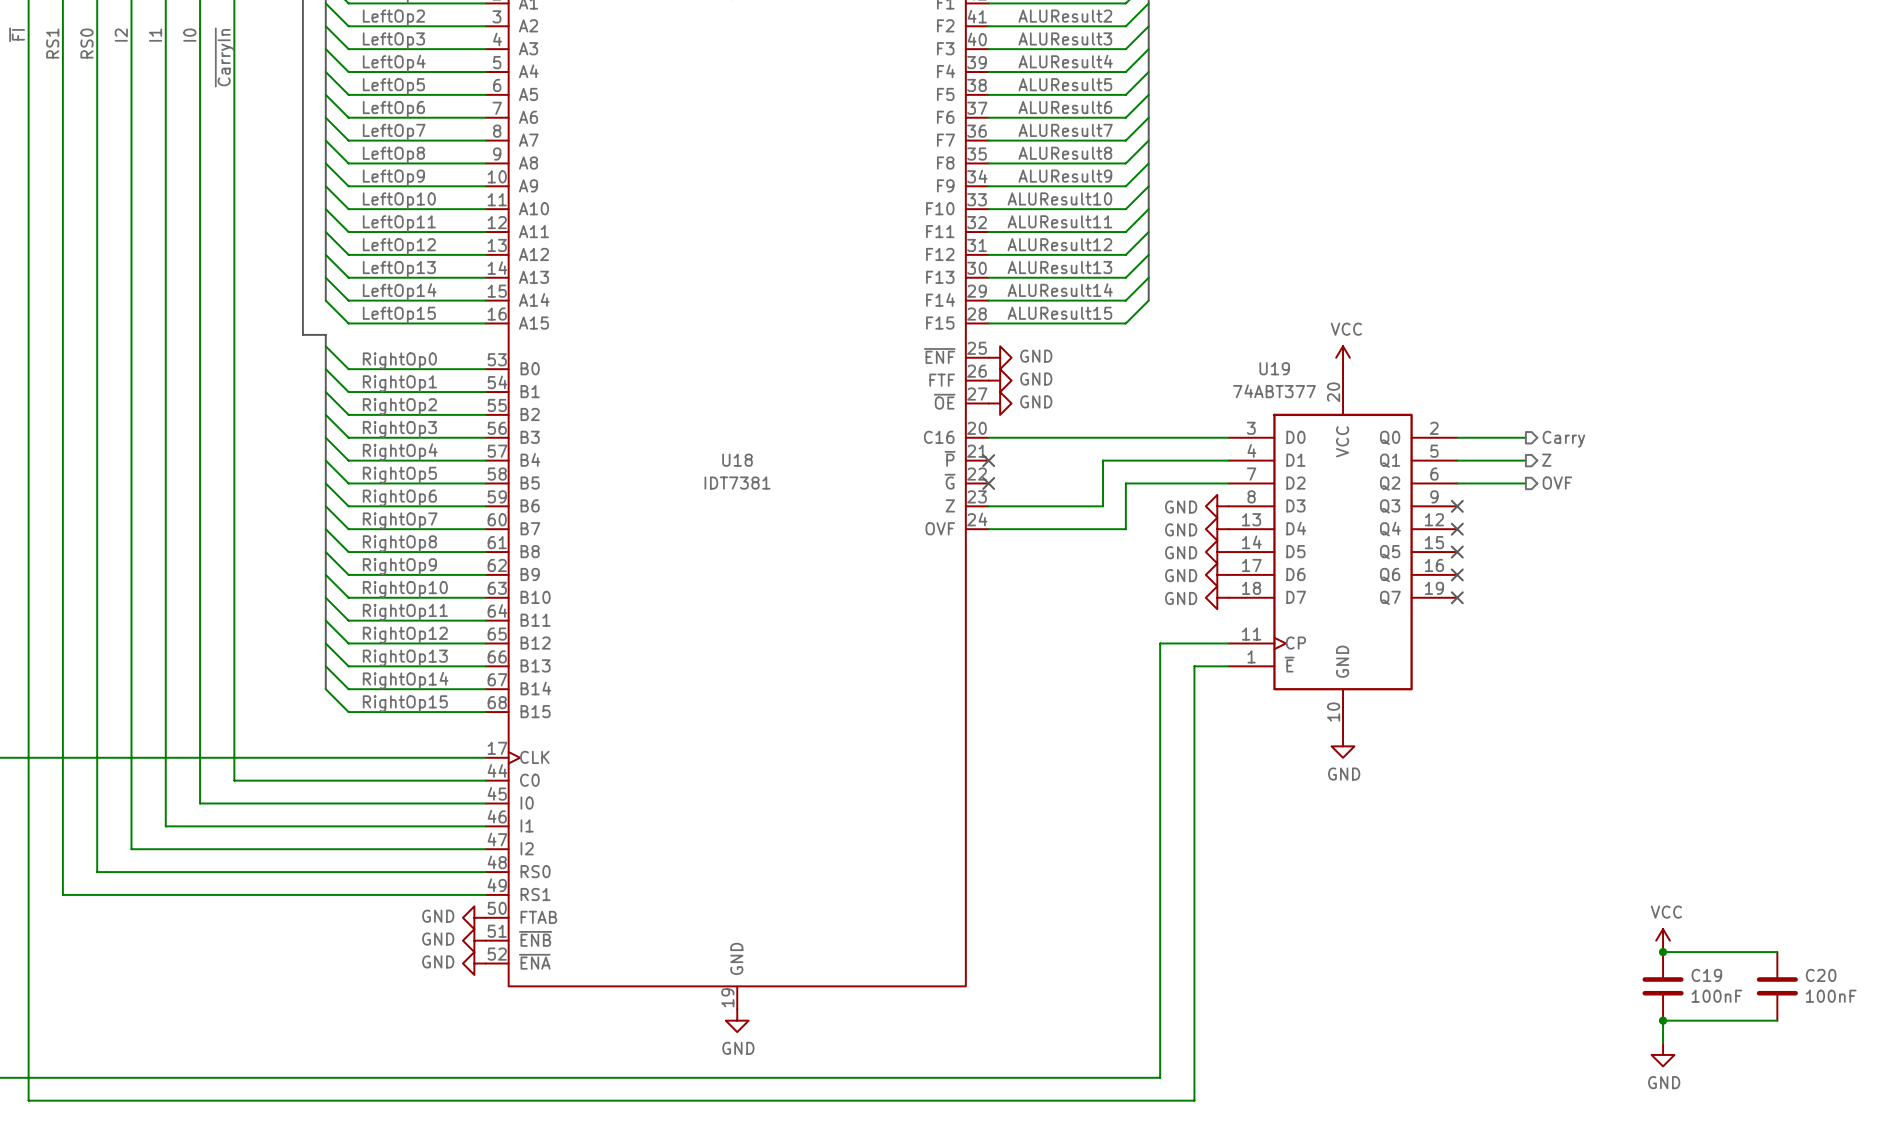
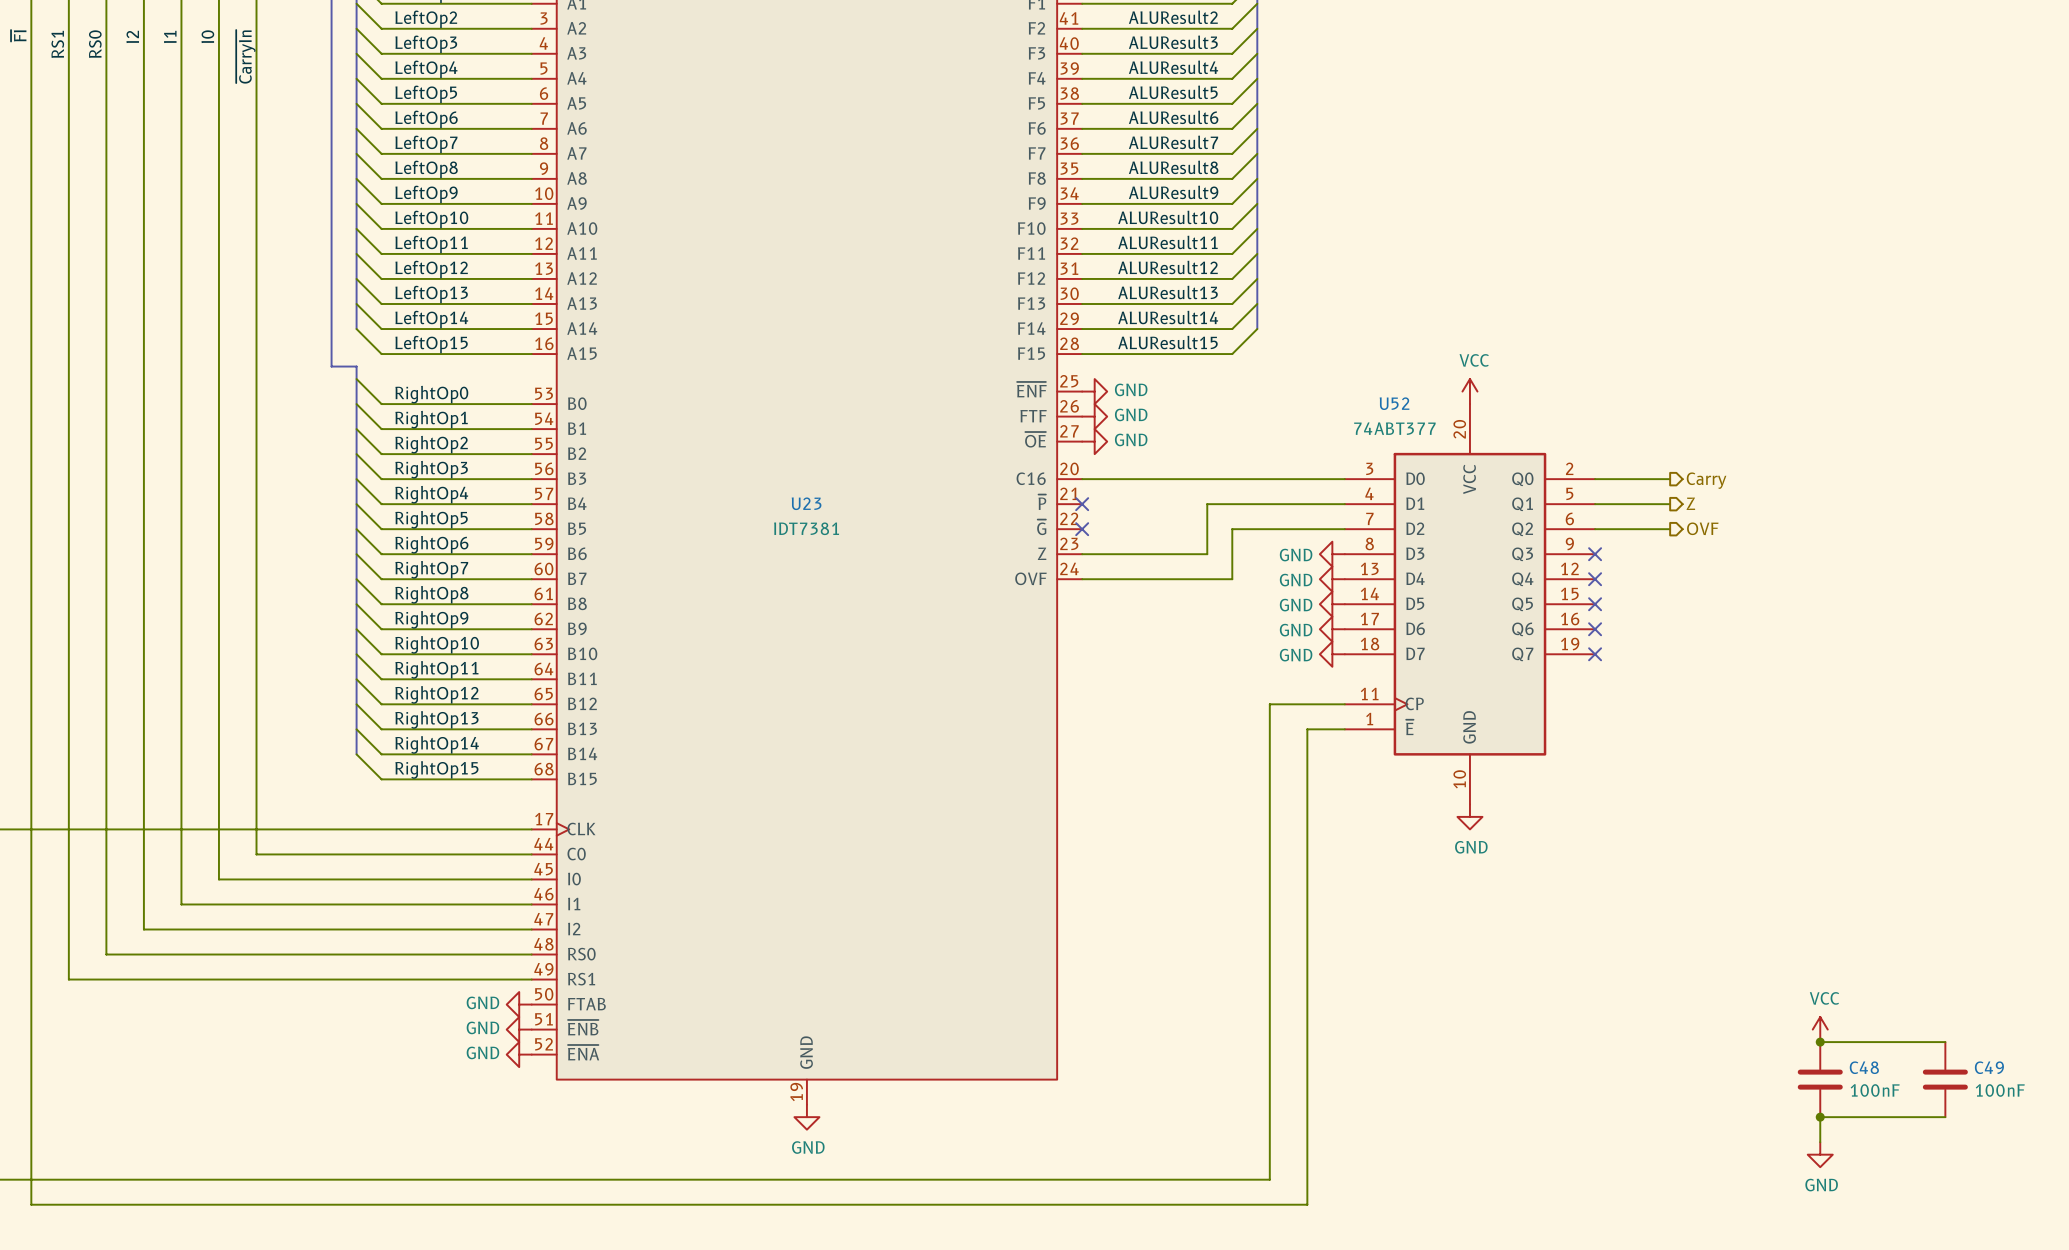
U19 name: U19 (1274, 368) -> U52 (1394, 403)
U18 name: U18 (737, 460) -> U23 (806, 503)
C19 name: C19 (1706, 975) -> C48 (1864, 1067)
C20 name: C20 (1821, 975) -> C49 (1989, 1067)

